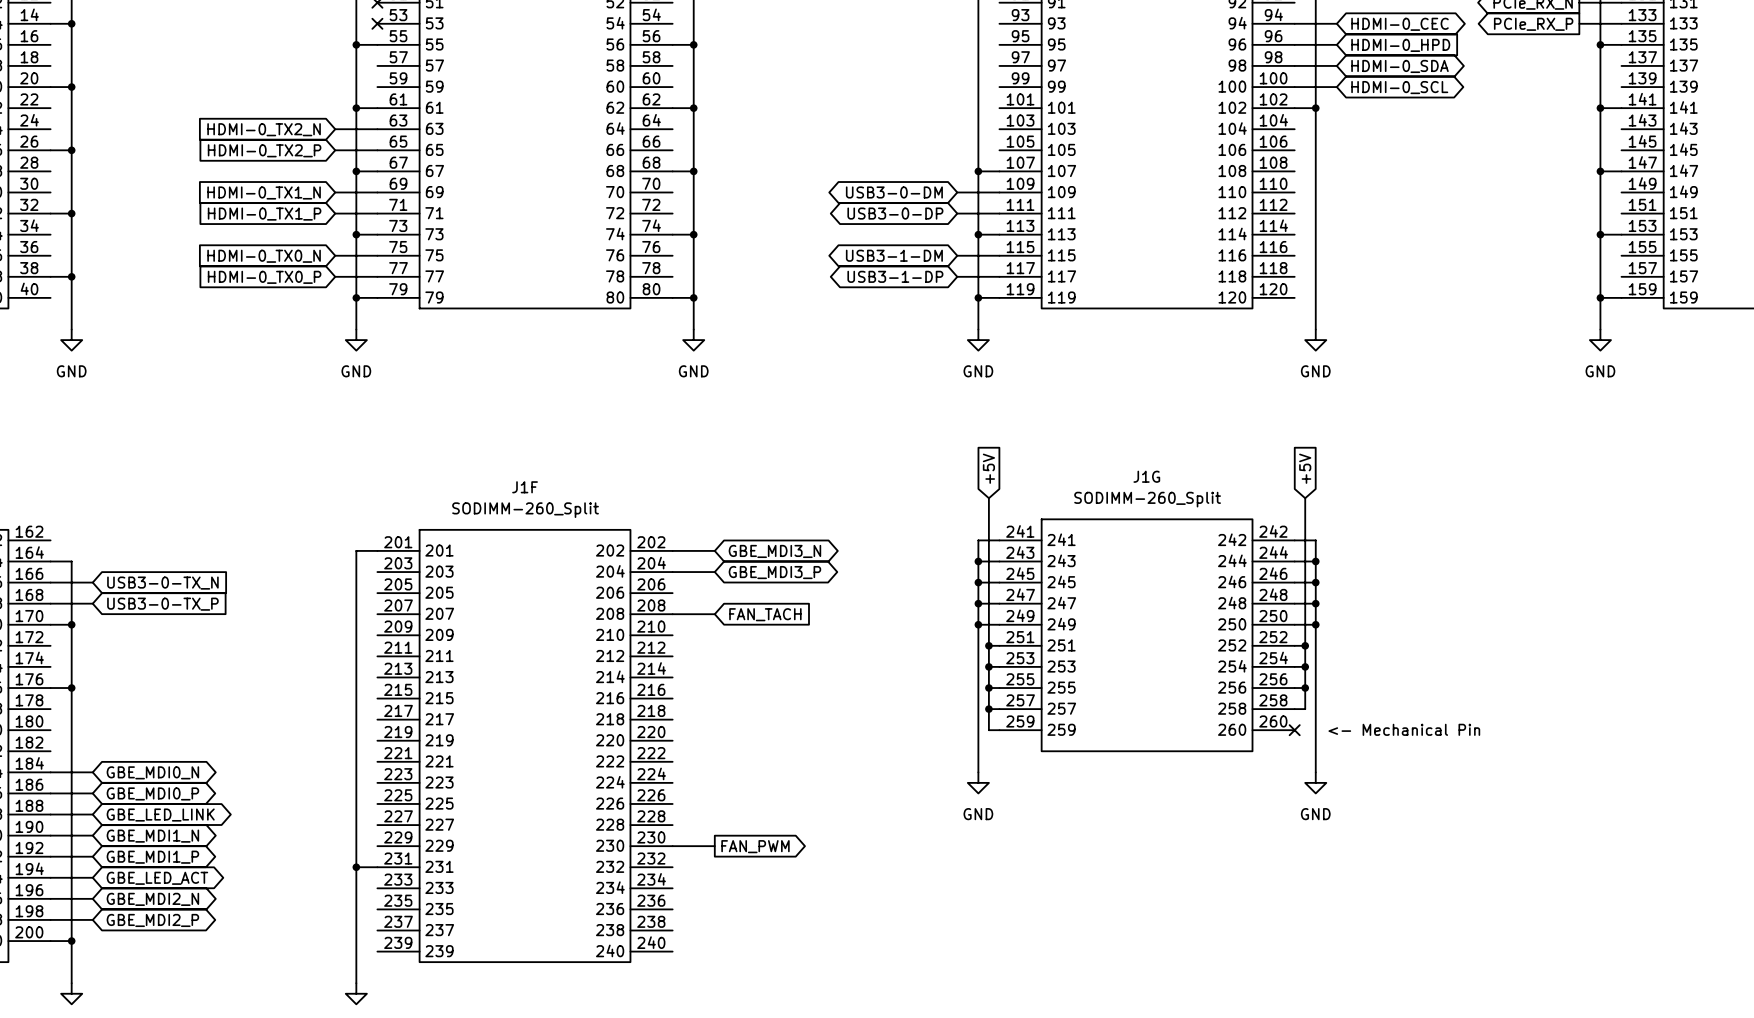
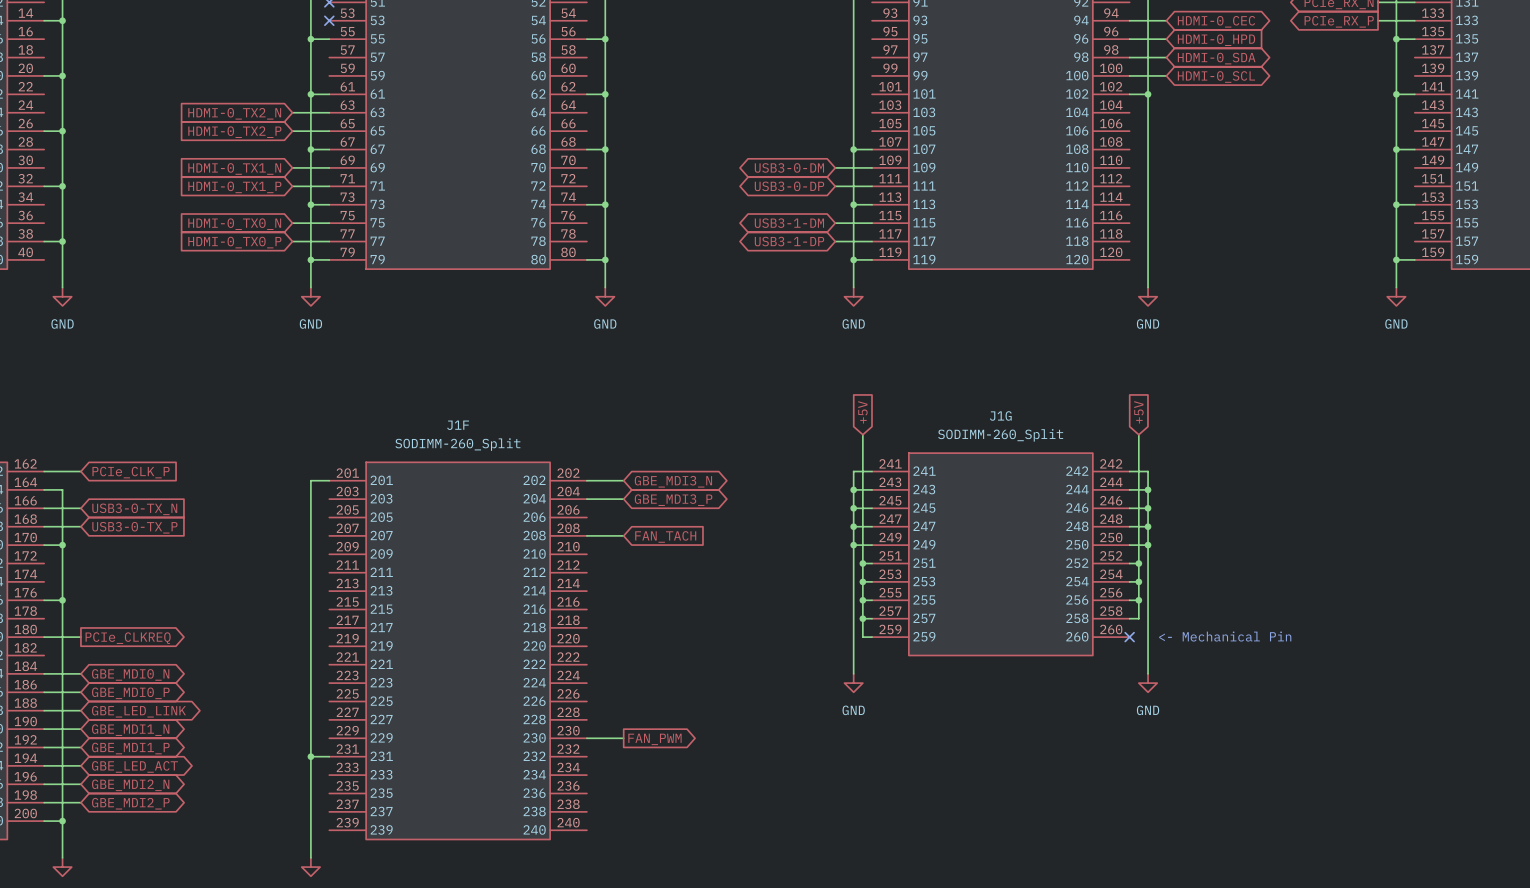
wire: none -> (44, 471) (80, 471)
global label: none -> PCIe_CLK_P (131, 472)
wire: none -> (44, 637) (80, 637)
global label: none -> PCIe_CLKREQ (128, 638)

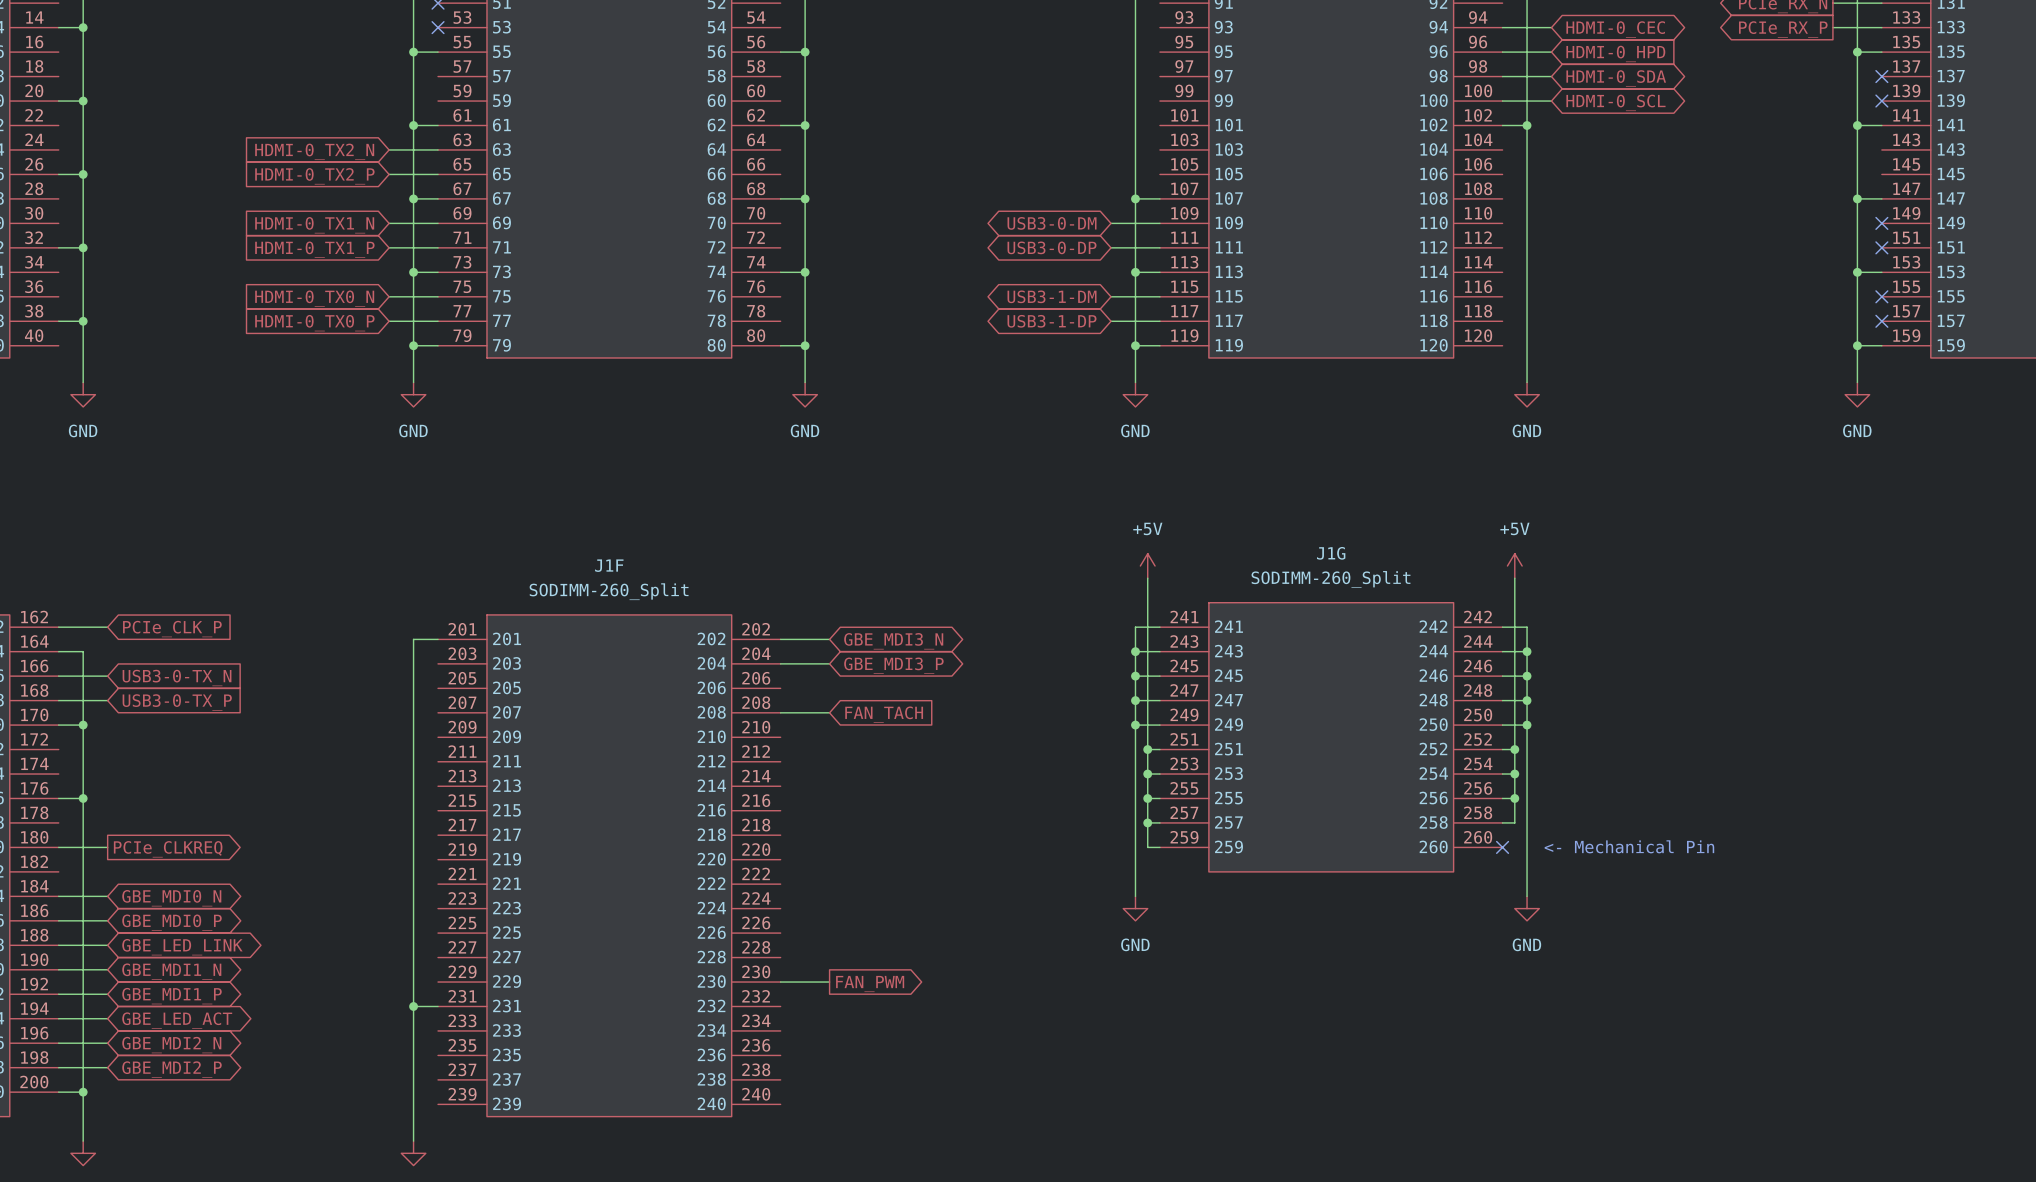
no-connect mark: none -> (1881, 76)
no-connect mark: none -> (1881, 101)
no-connect mark: none -> (1881, 223)
no-connect mark: none -> (1881, 247)
no-connect mark: none -> (1881, 296)
no-connect mark: none -> (1881, 321)
global label: +5V (862, 412) -> none
global label: +5V (1138, 412) -> none
power symbol: none -> +5V (1147, 566)
power symbol: none -> +5V (1514, 566)

